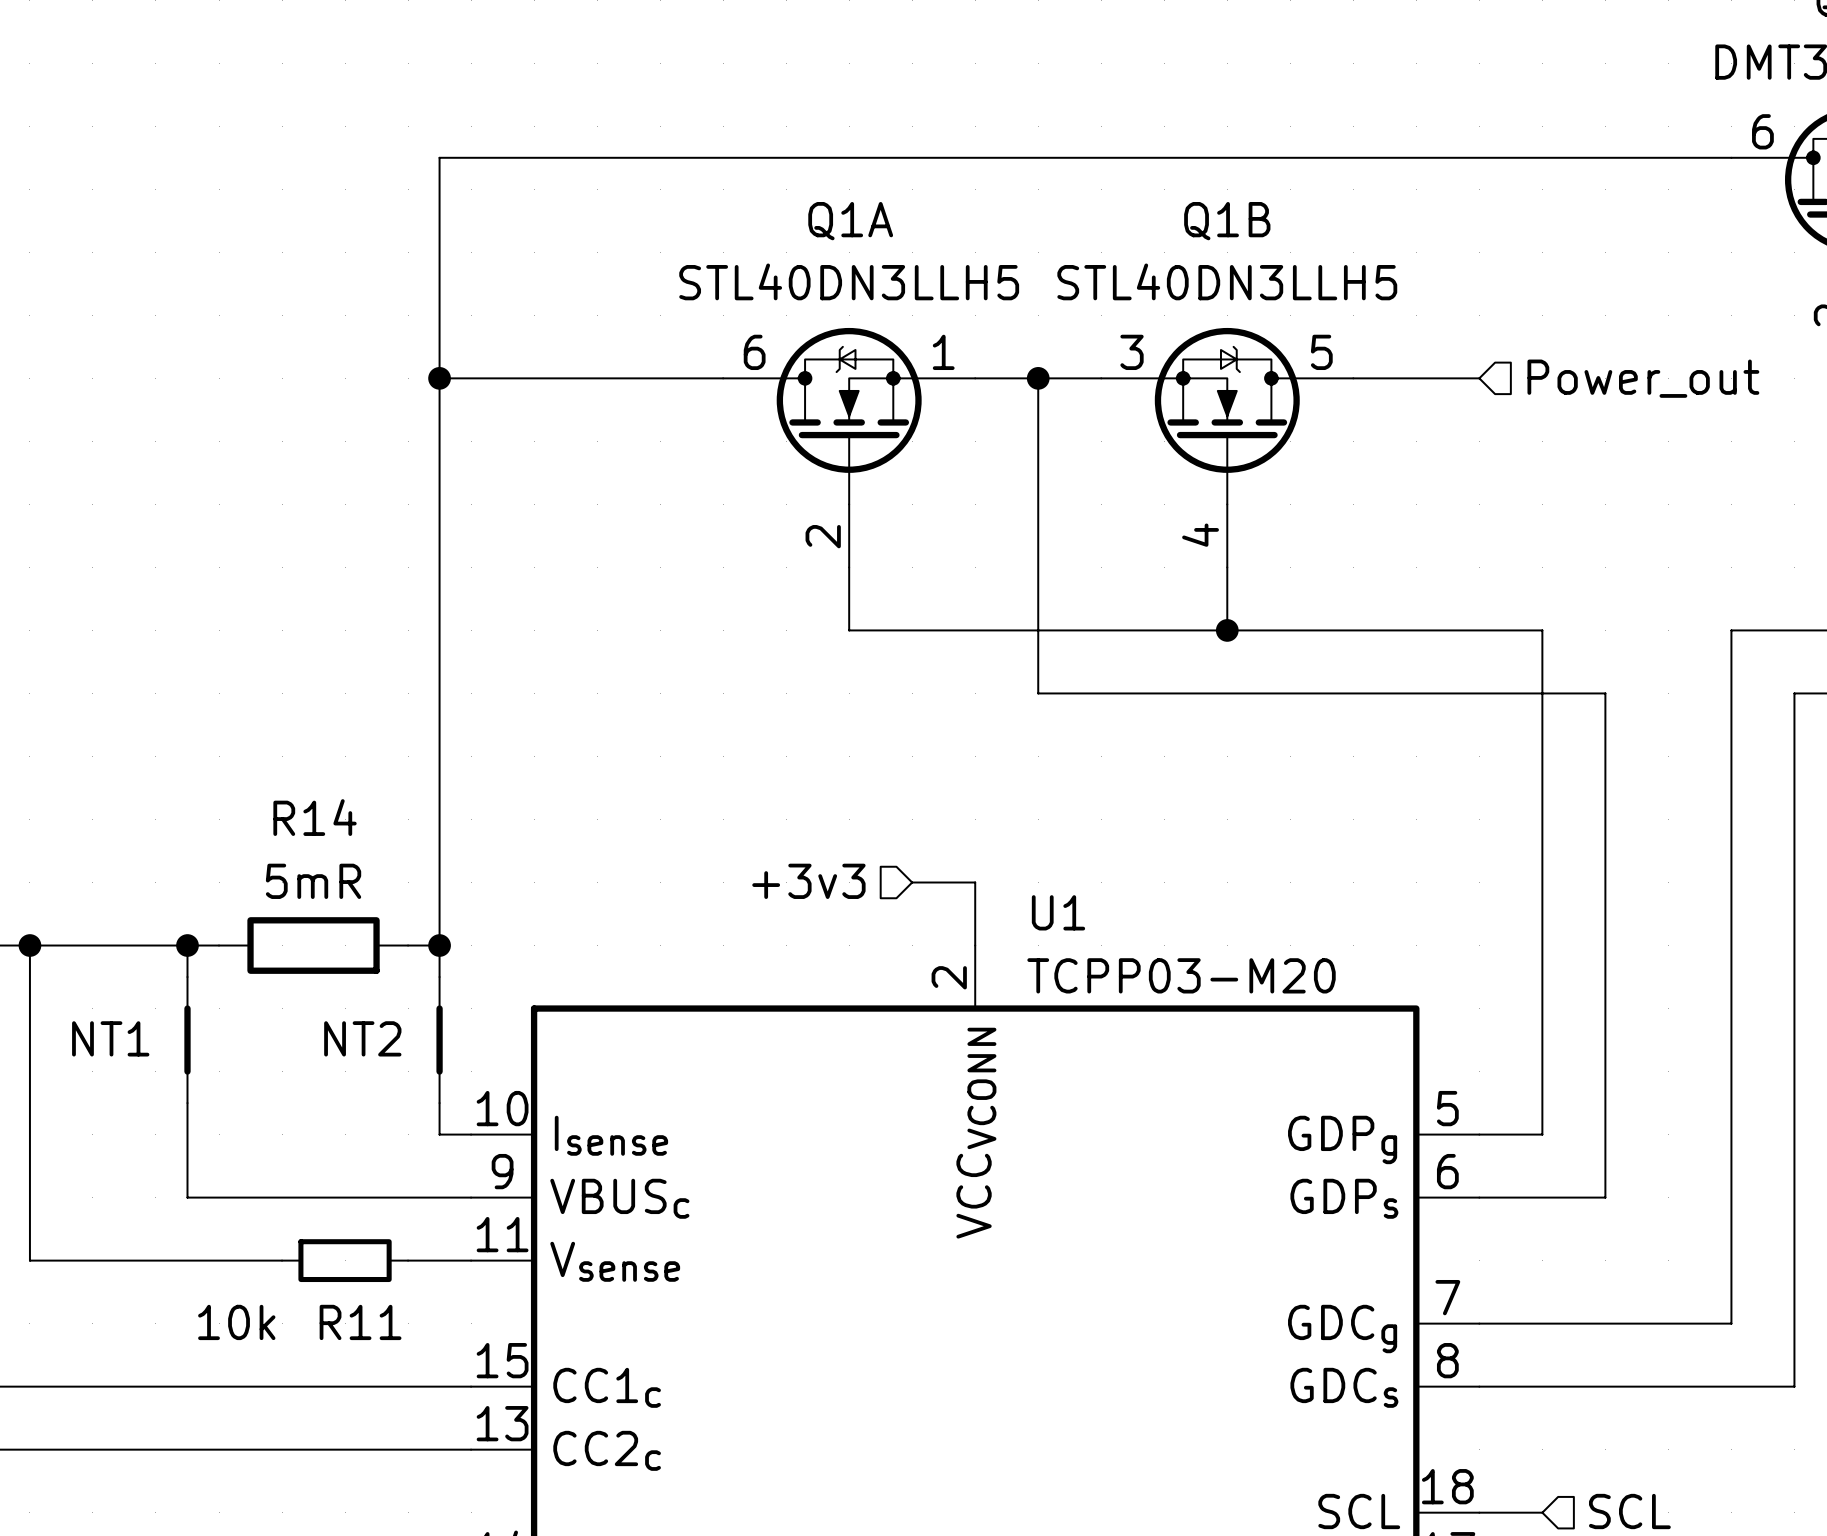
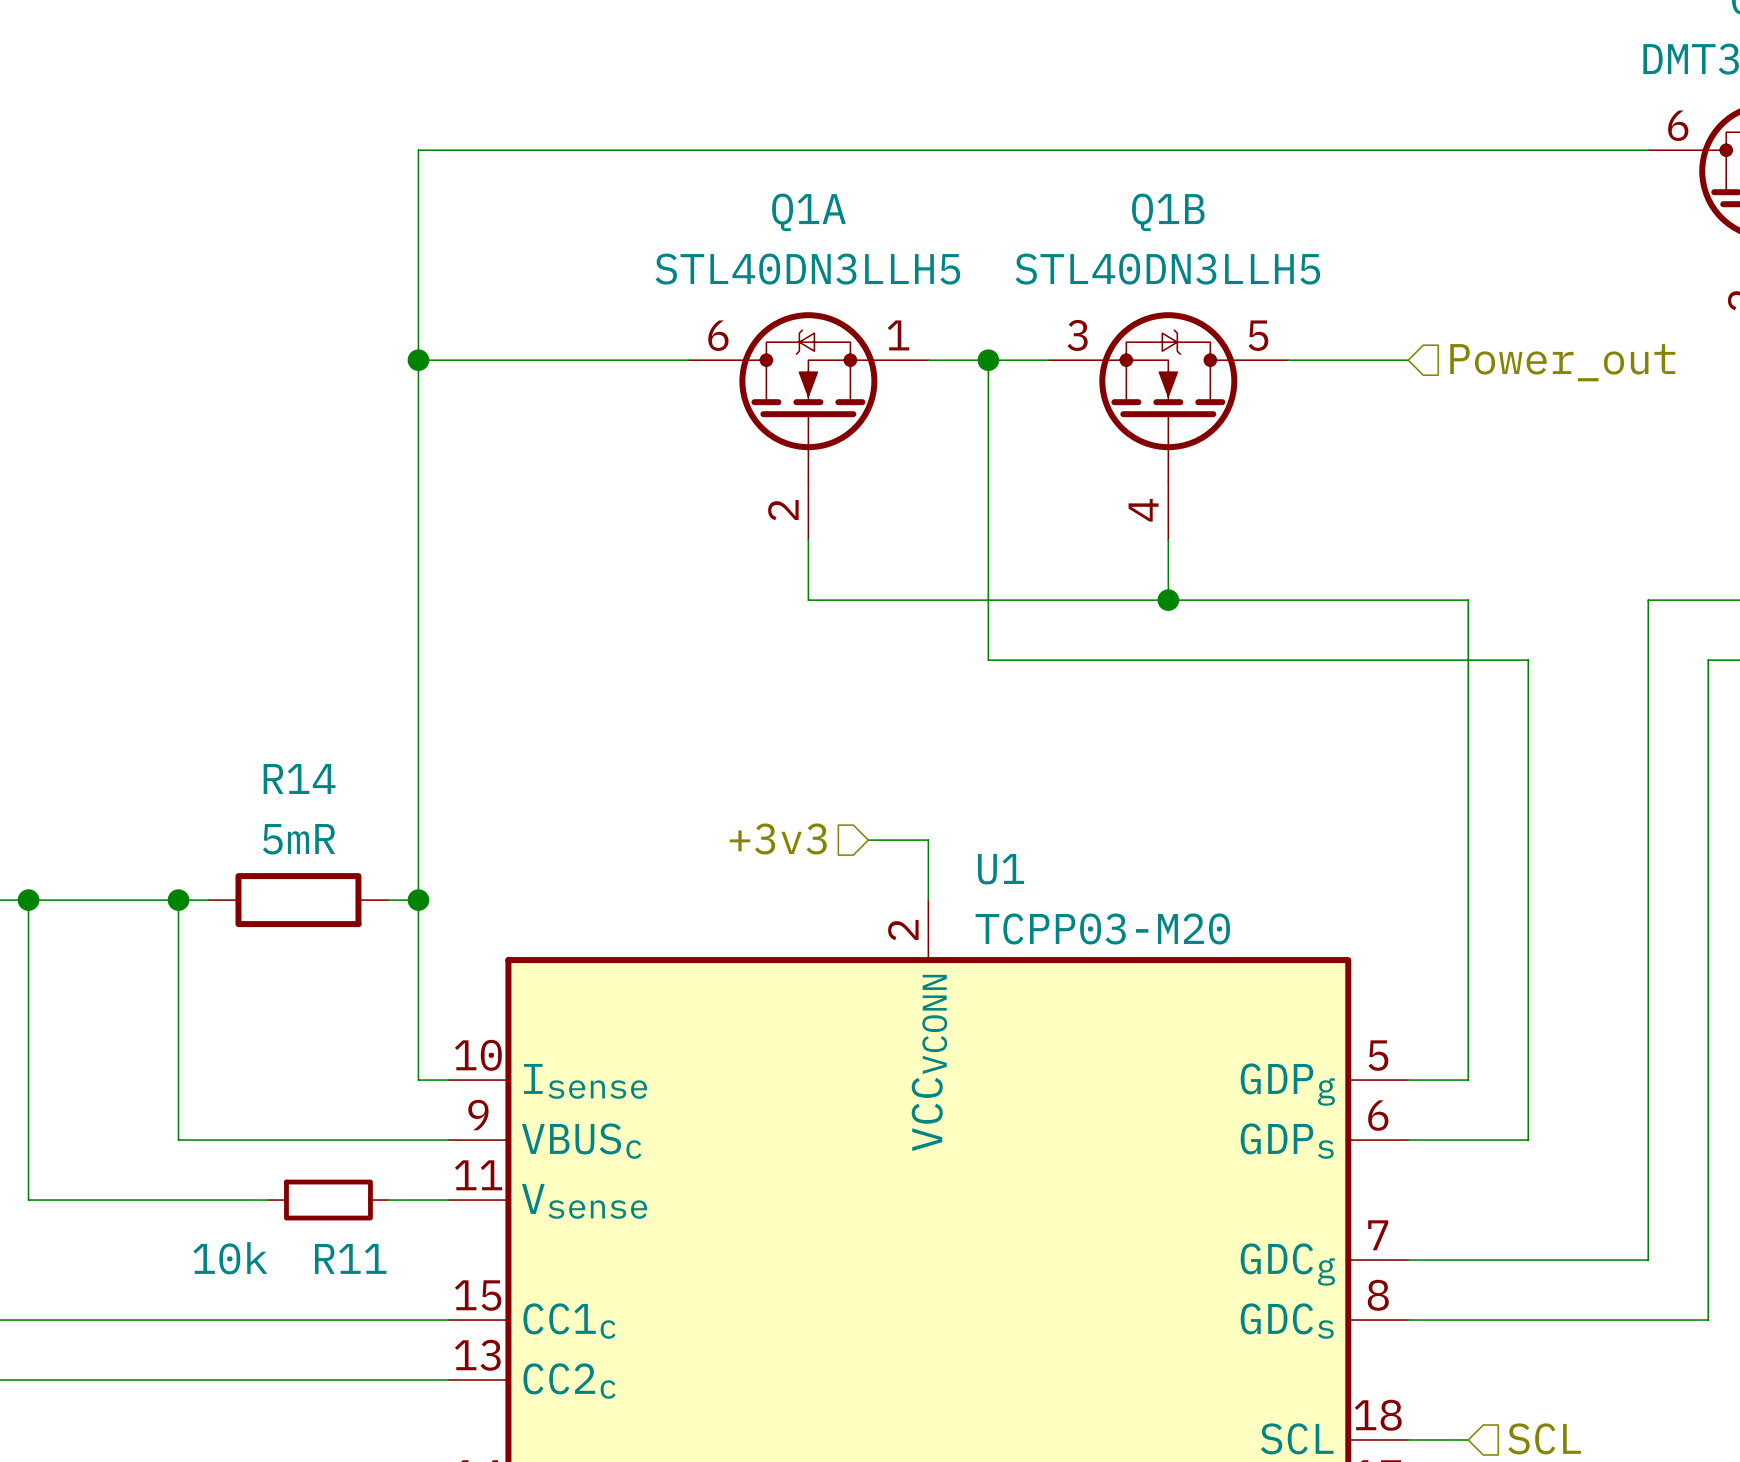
NT1: (187, 1040) -> none
NT2: (439, 1040) -> none

